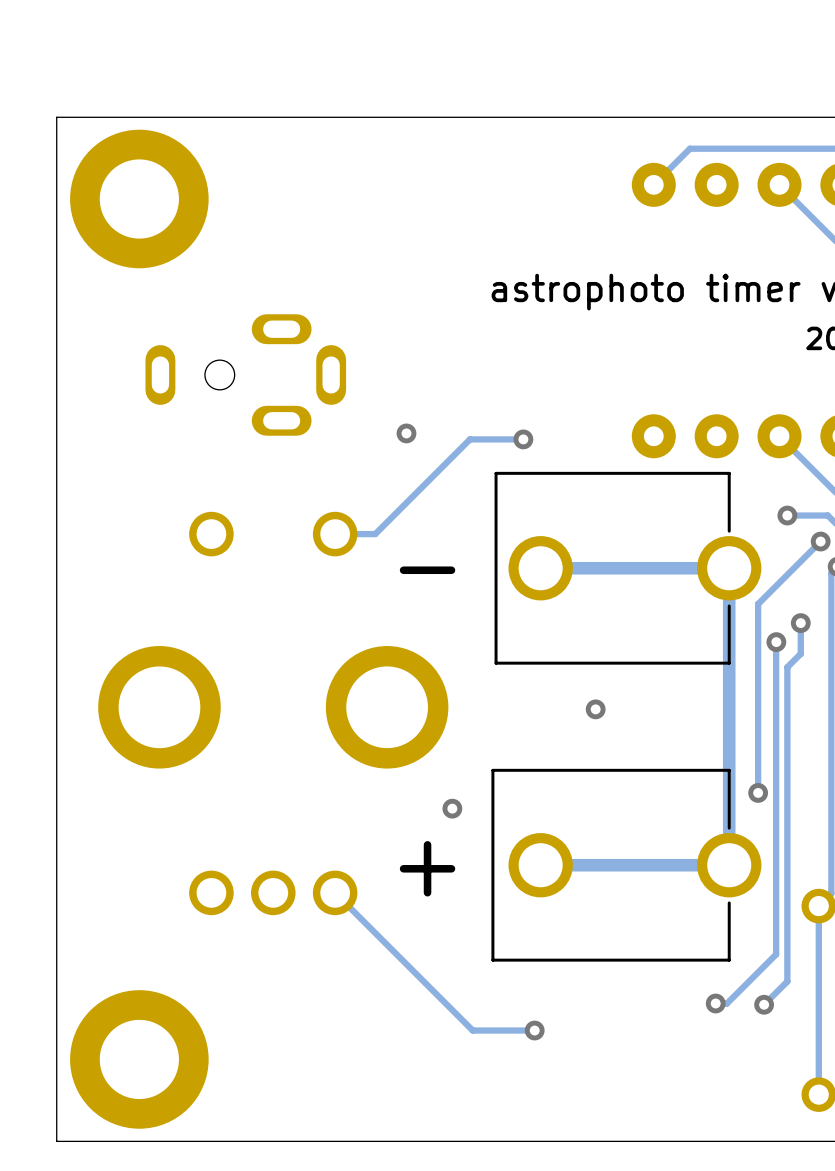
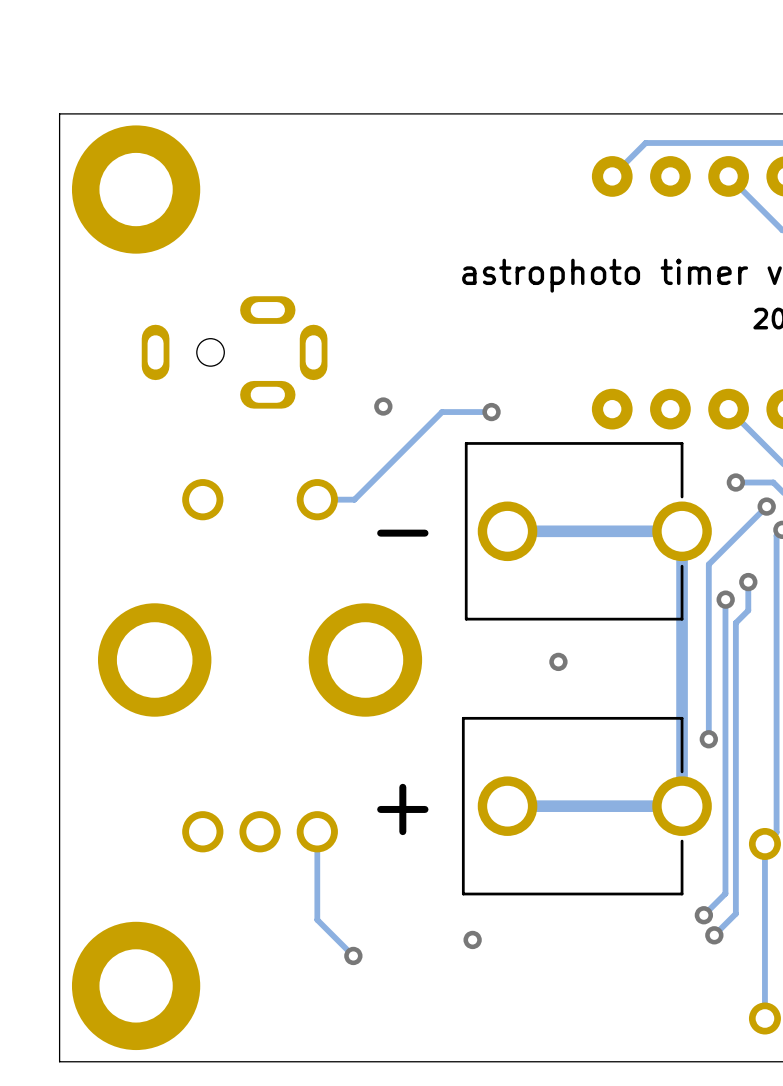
via: (452, 808) -> none
track: (335, 892) (472, 1030) (534, 1030) -> (317, 831) (317, 919) (353, 955)
track: (776, 954) (727, 1003) (715, 1003) -> (725, 888) (725, 893) (703, 915)
via position: (715, 1003) -> (703, 915)
via: none -> (353, 955)
via position: (534, 1030) -> (472, 939)

